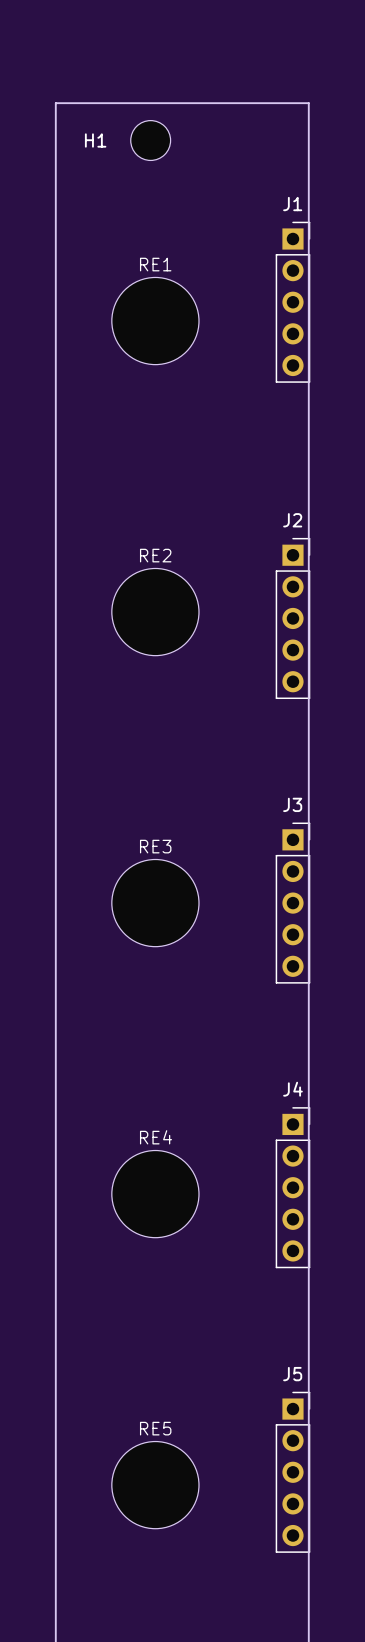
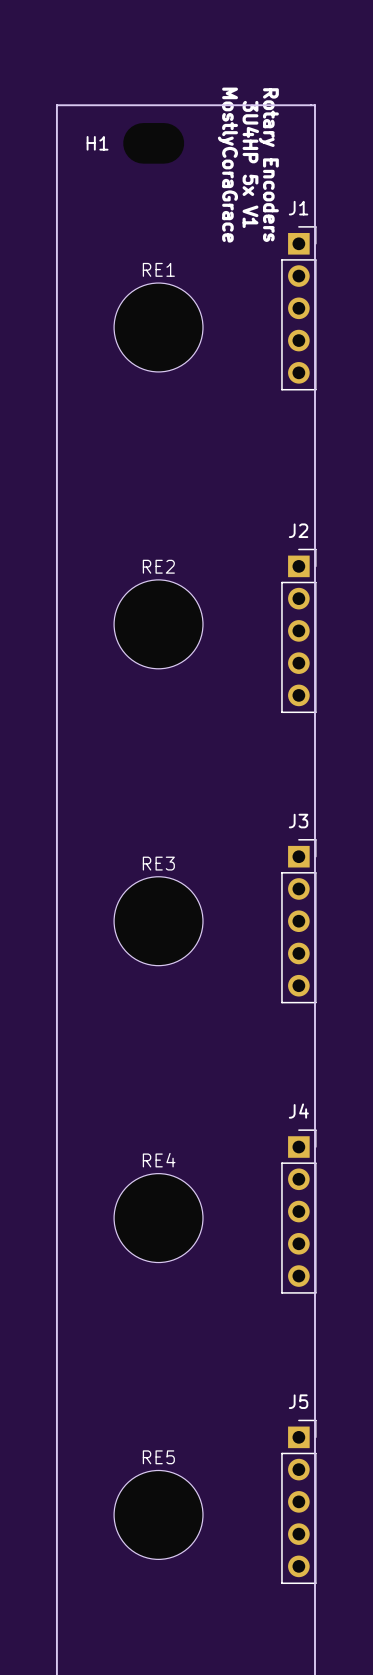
H1 footprint: [130, 120, 171, 161] -> [123, 123, 185, 164]
text: none -> MostlyCoraGrace (227, 165)
text: none -> 3U4HP 5x V1 (250, 164)
text: none -> Rotary Encoders (268, 165)

